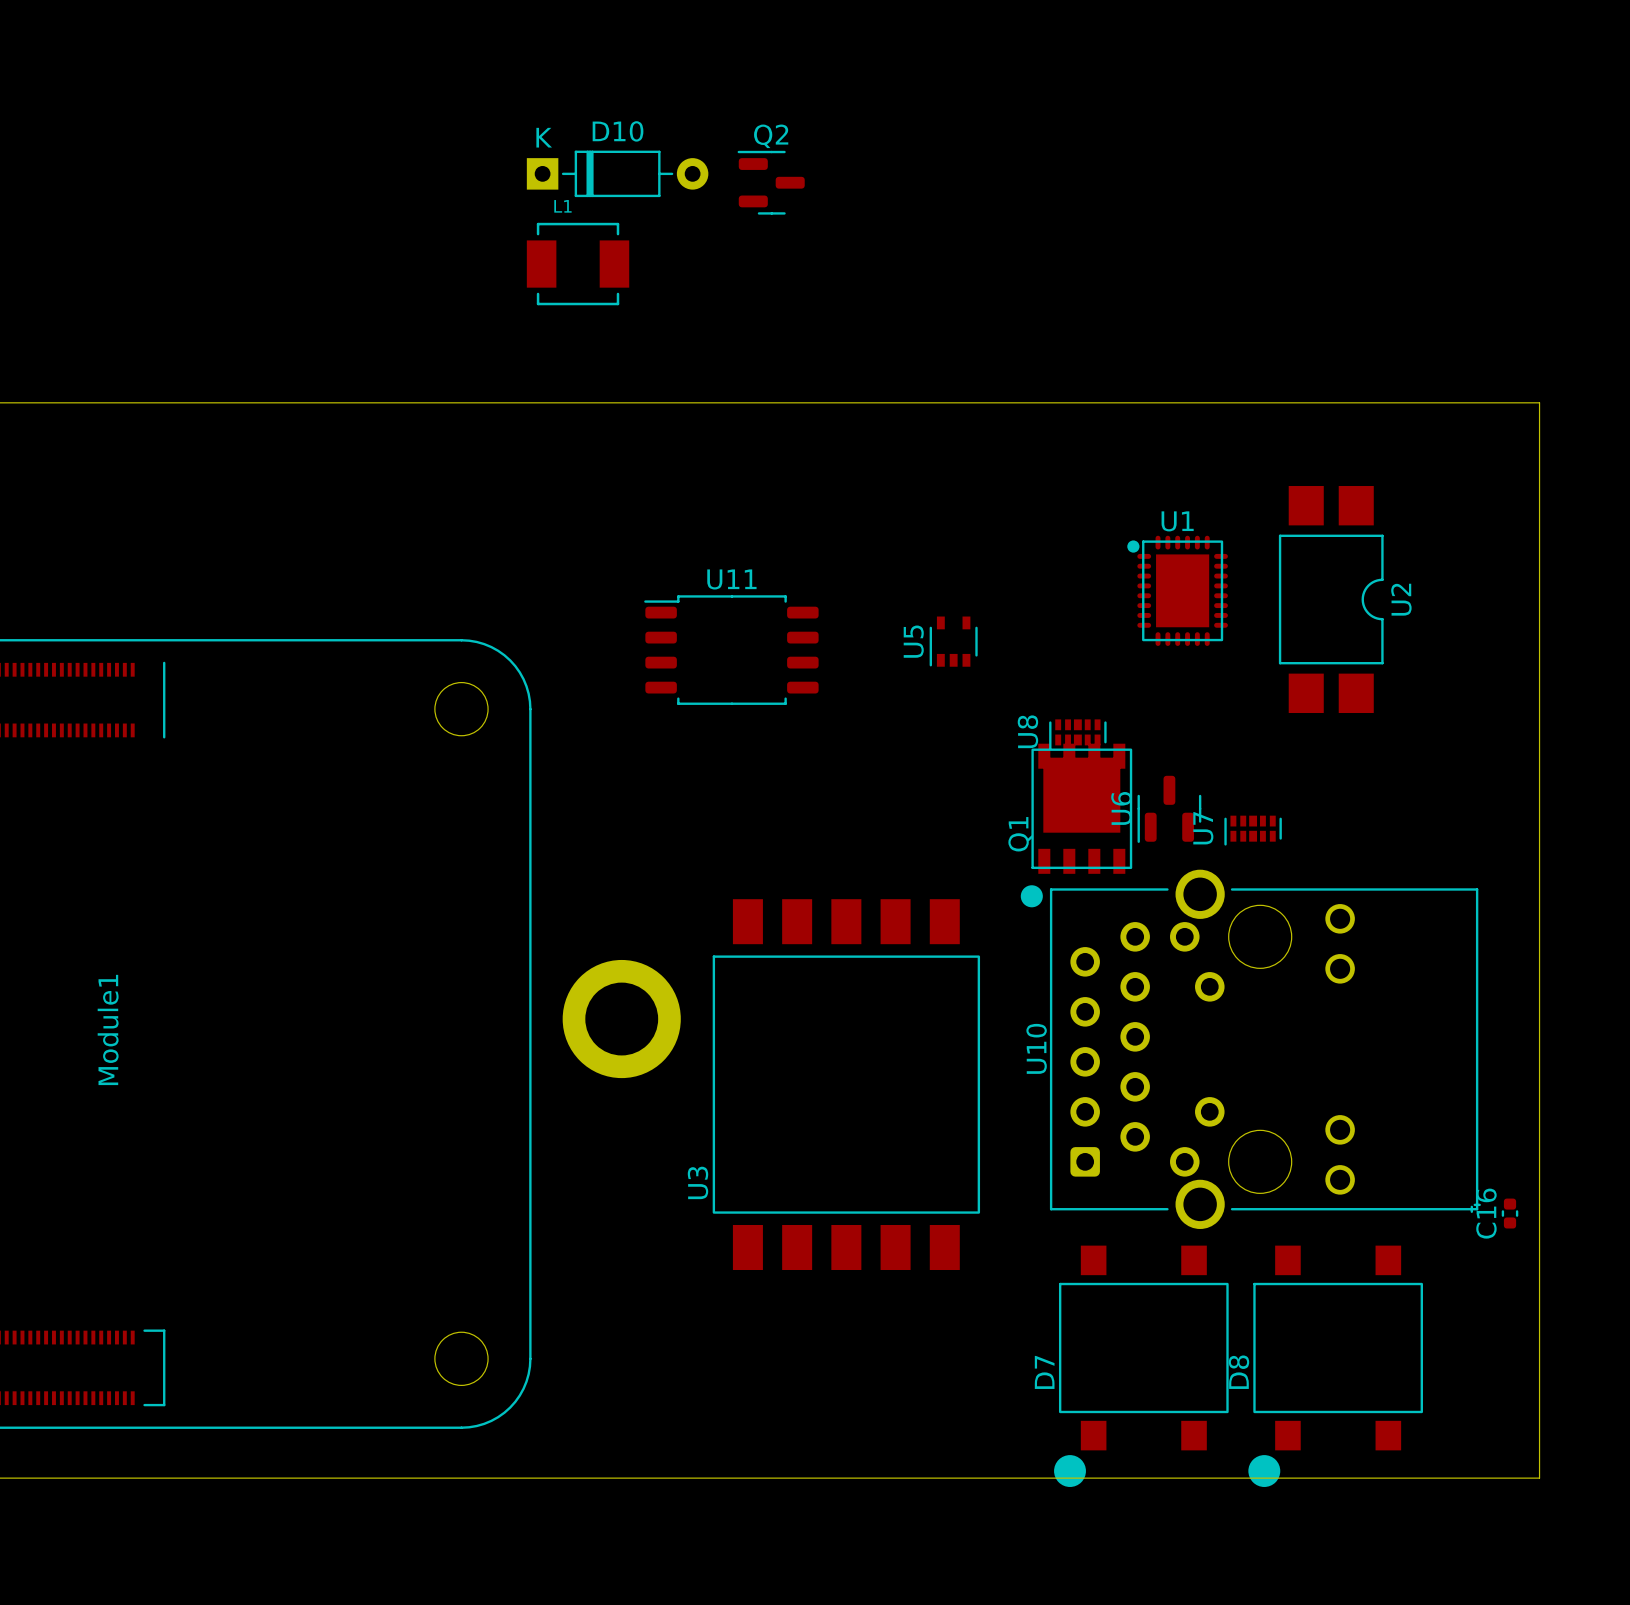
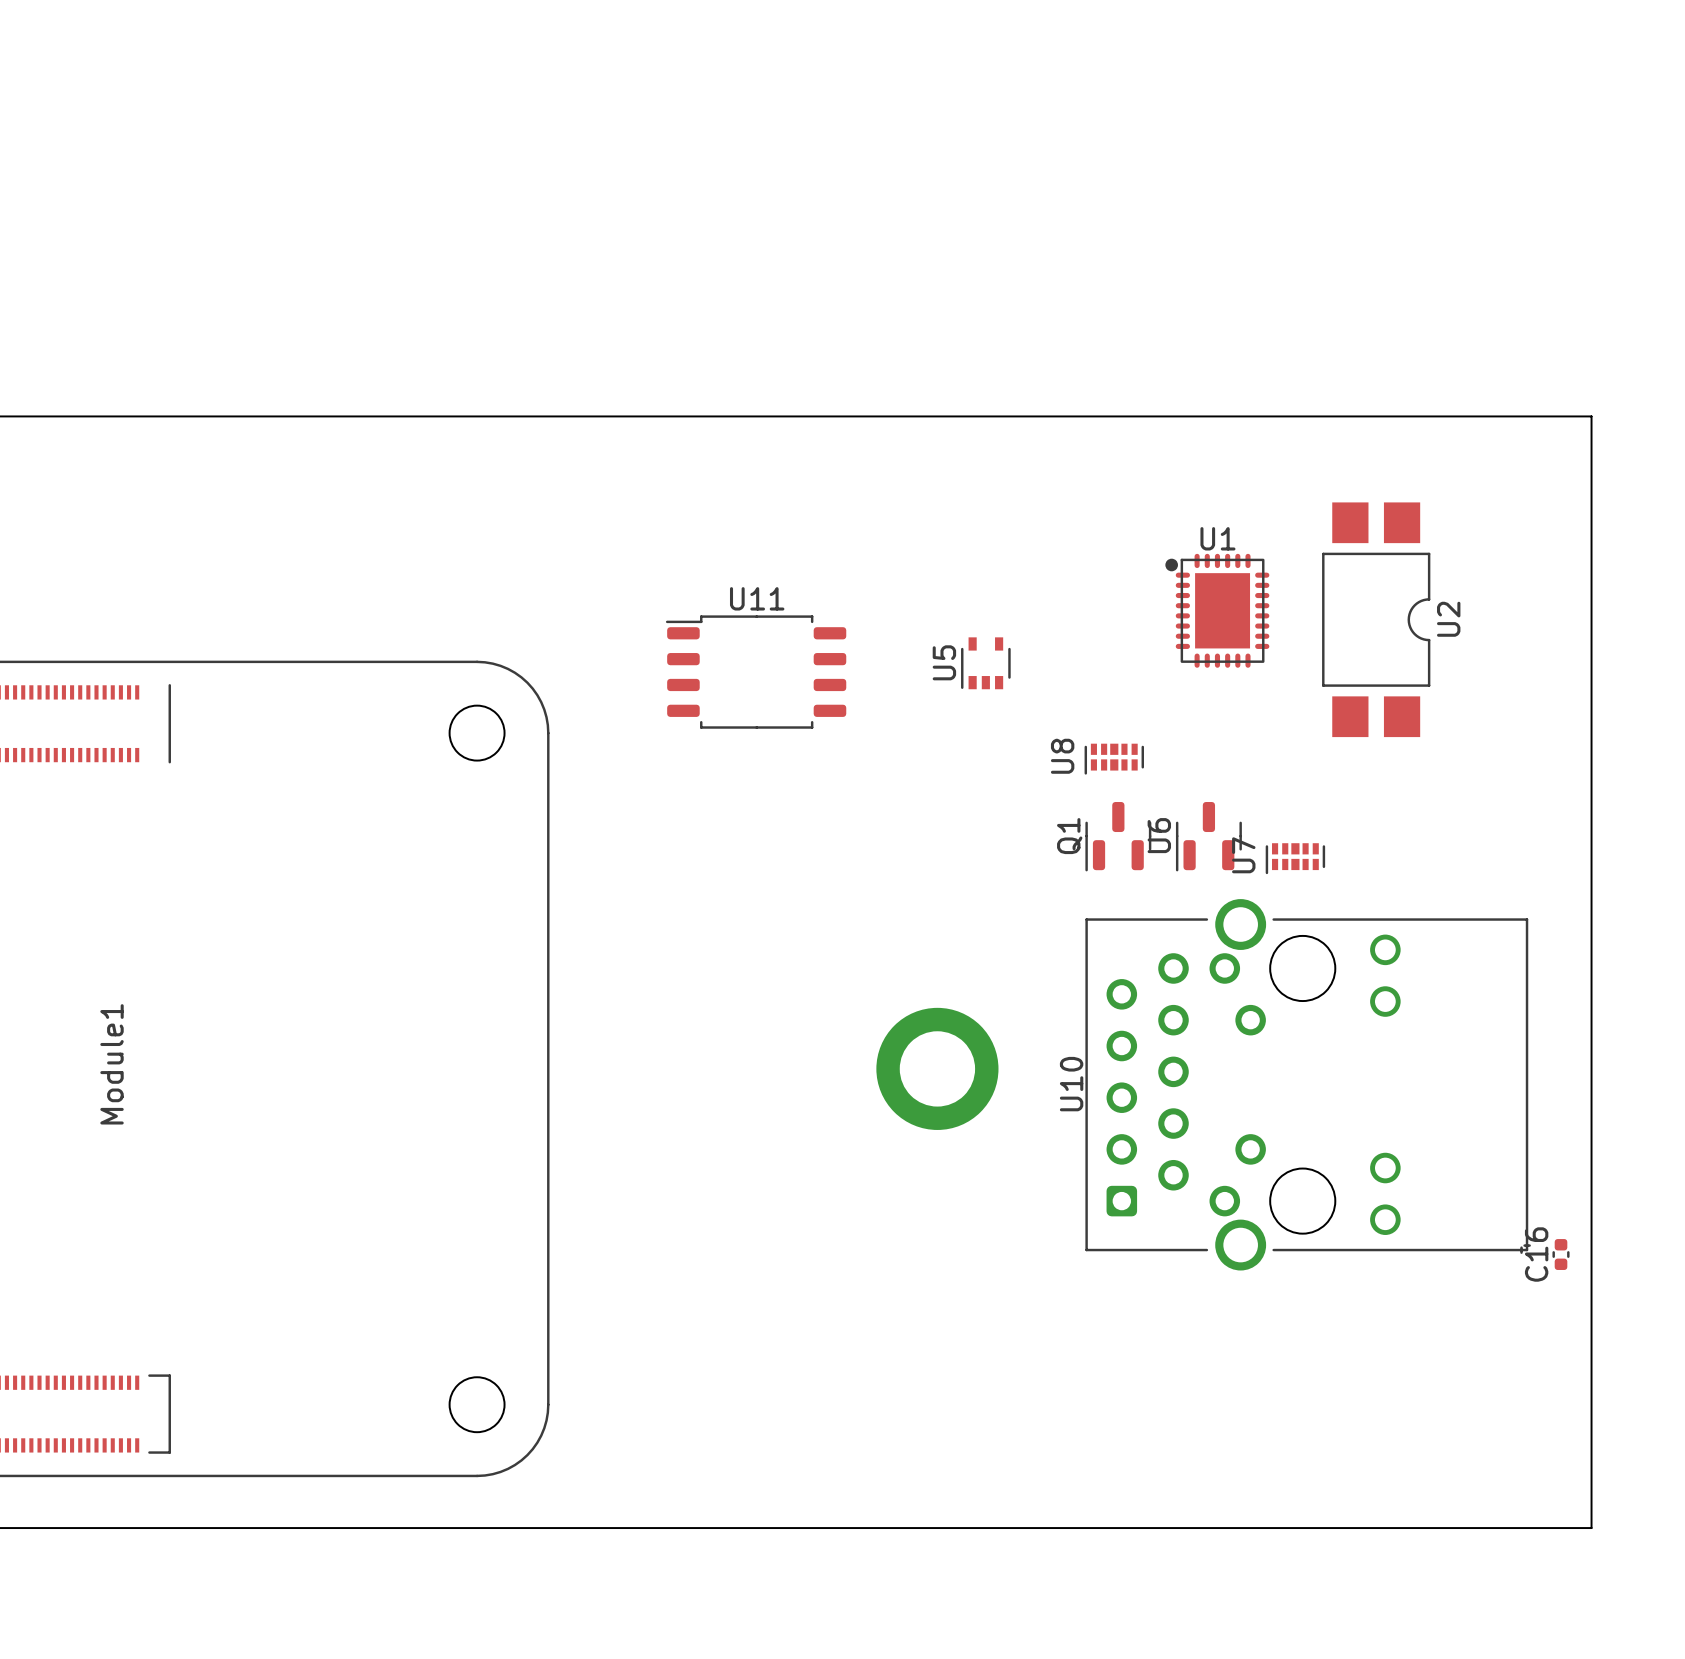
D10: (617, 173) -> none
Q2: (771, 182) -> none
L1: (578, 264) -> none
Q1 footprint: [1020, 743, 1133, 908] -> [1085, 802, 1152, 872]
part position: (621, 1019) -> (937, 1068)
U3: (846, 1084) -> none
D7: (1141, 1366) -> none
D8: (1335, 1366) -> none

